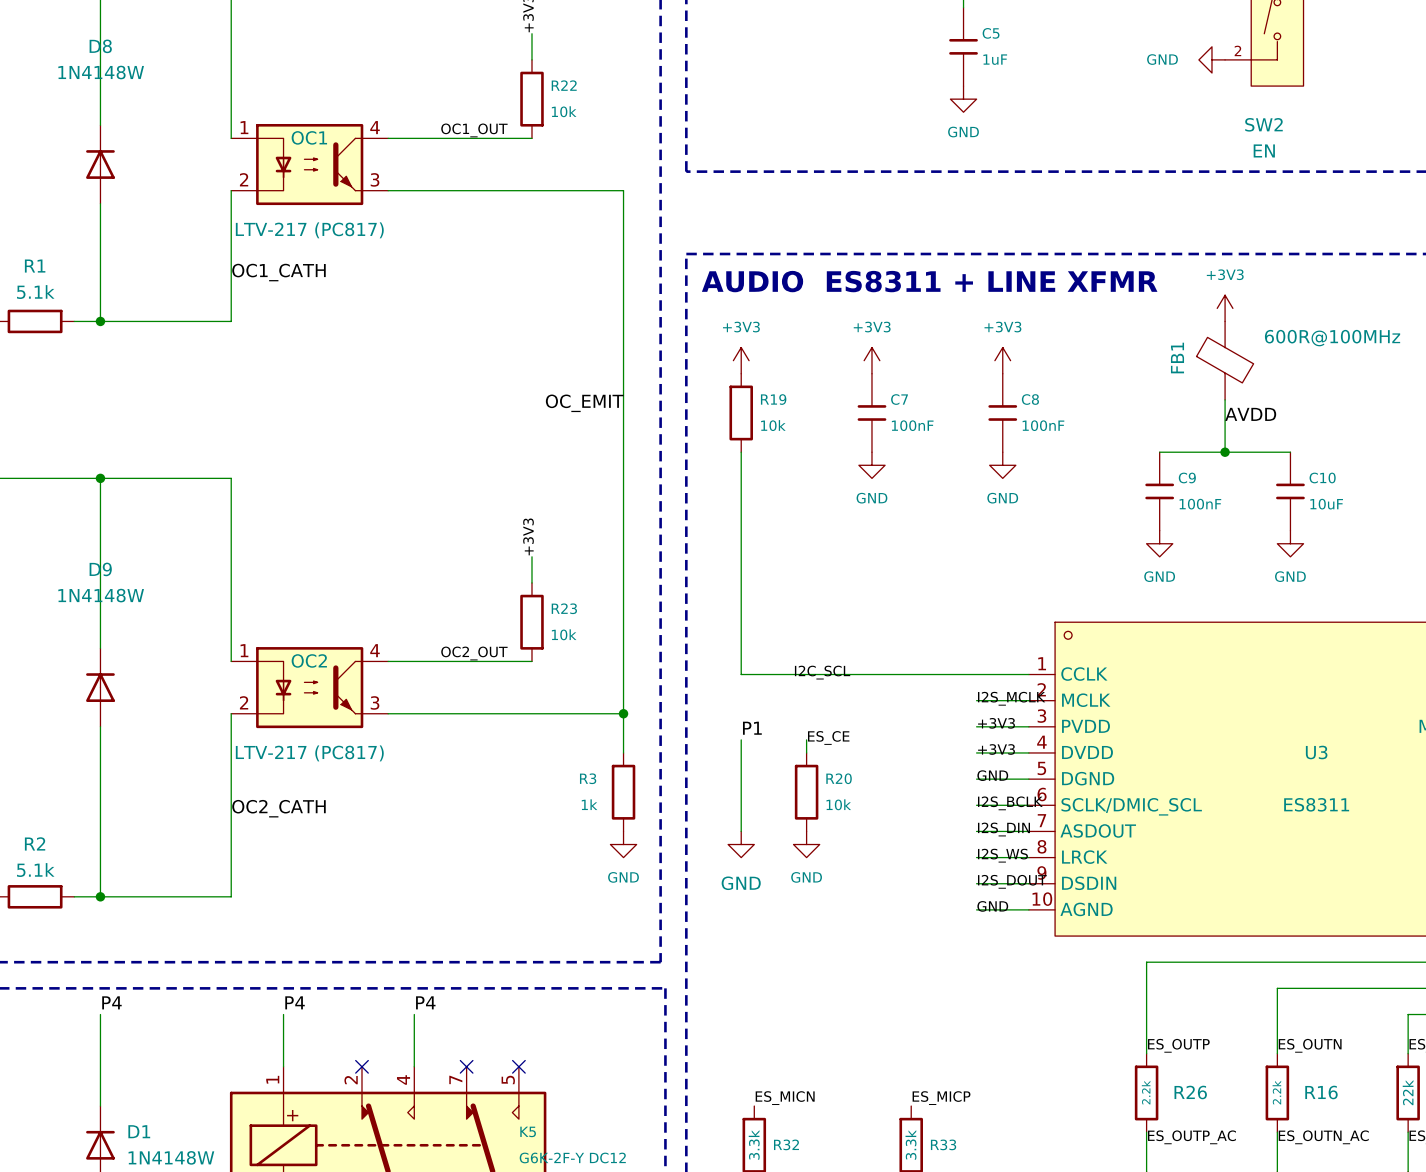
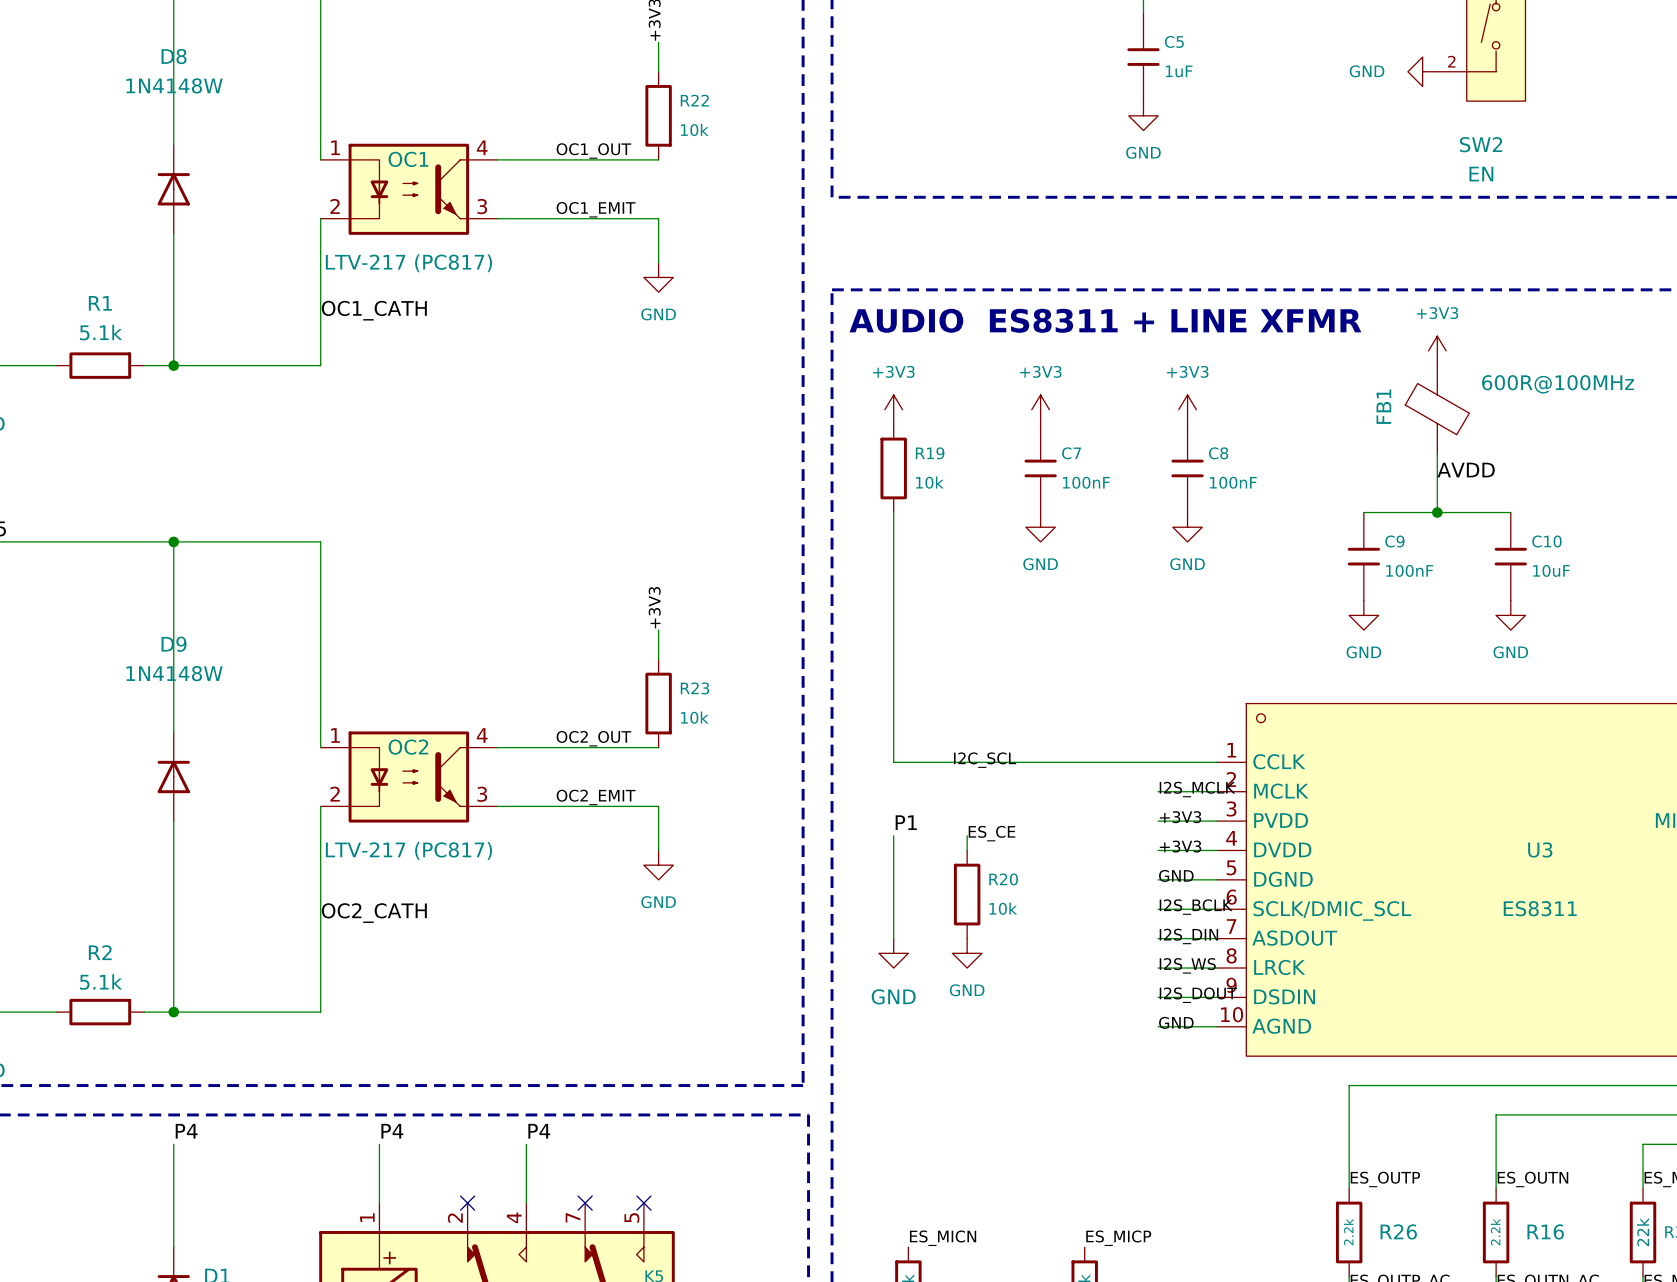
label: none -> OC1_EMIT (596, 209)
wire: (531, 190) (623, 190) (623, 752) -> (658, 218) (658, 262)
power symbol: none -> GND (658, 277)
label: OC_EMIT (584, 403) -> none
label: none -> OC2_EMIT (596, 797)
wire: (531, 713) (623, 713) -> (658, 806) (658, 850)
junction: (623, 713) -> none
R3: 1k (623, 792) -> none
power symbol position: GND (623, 844) -> GND (658, 865)

